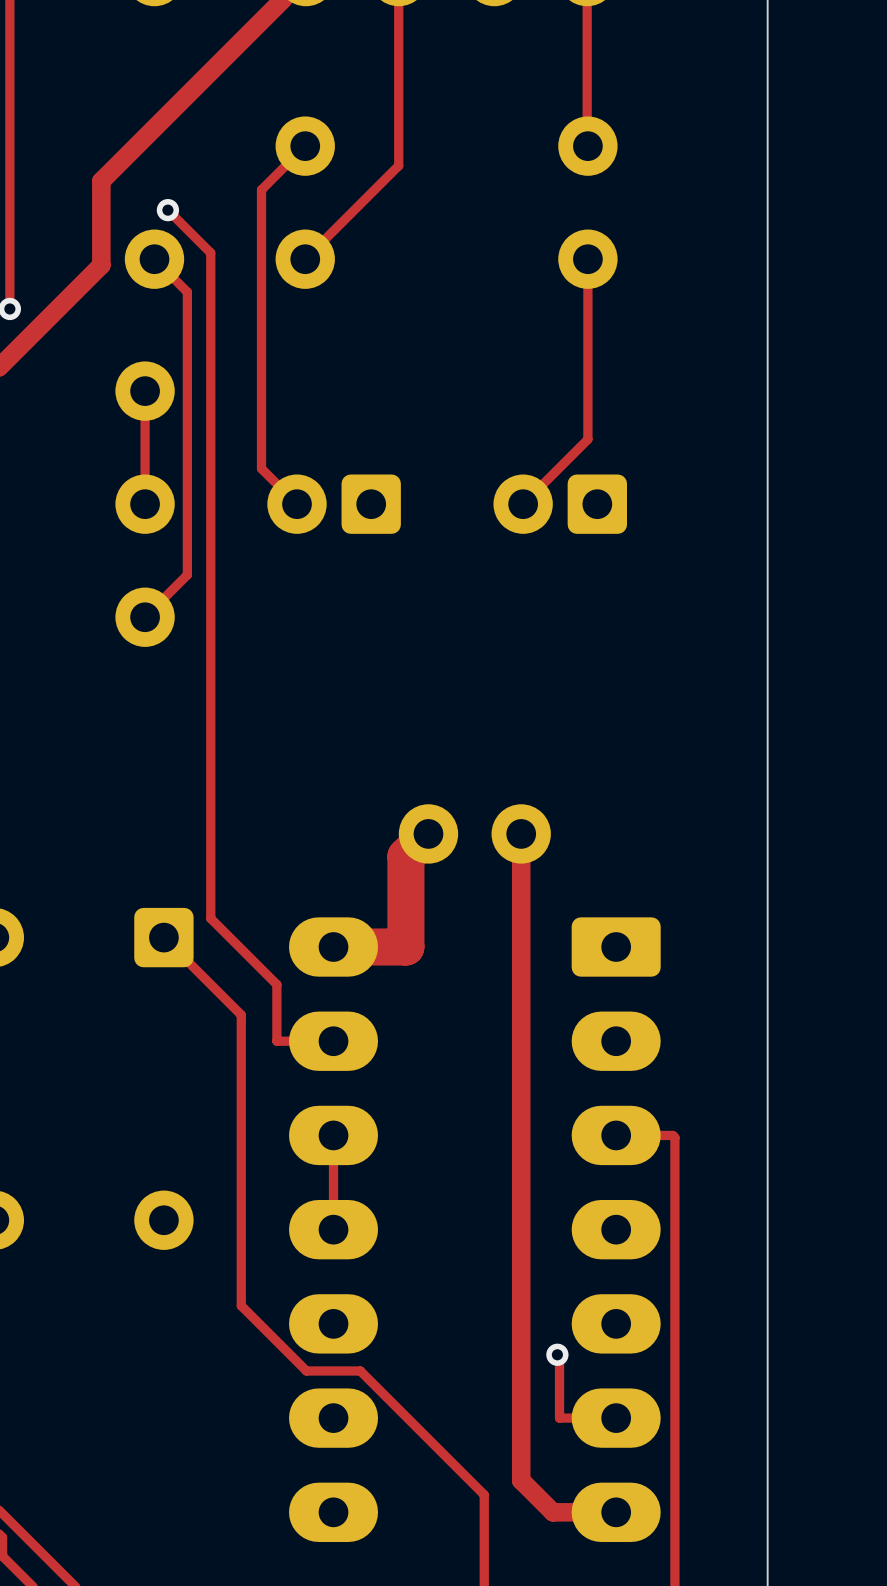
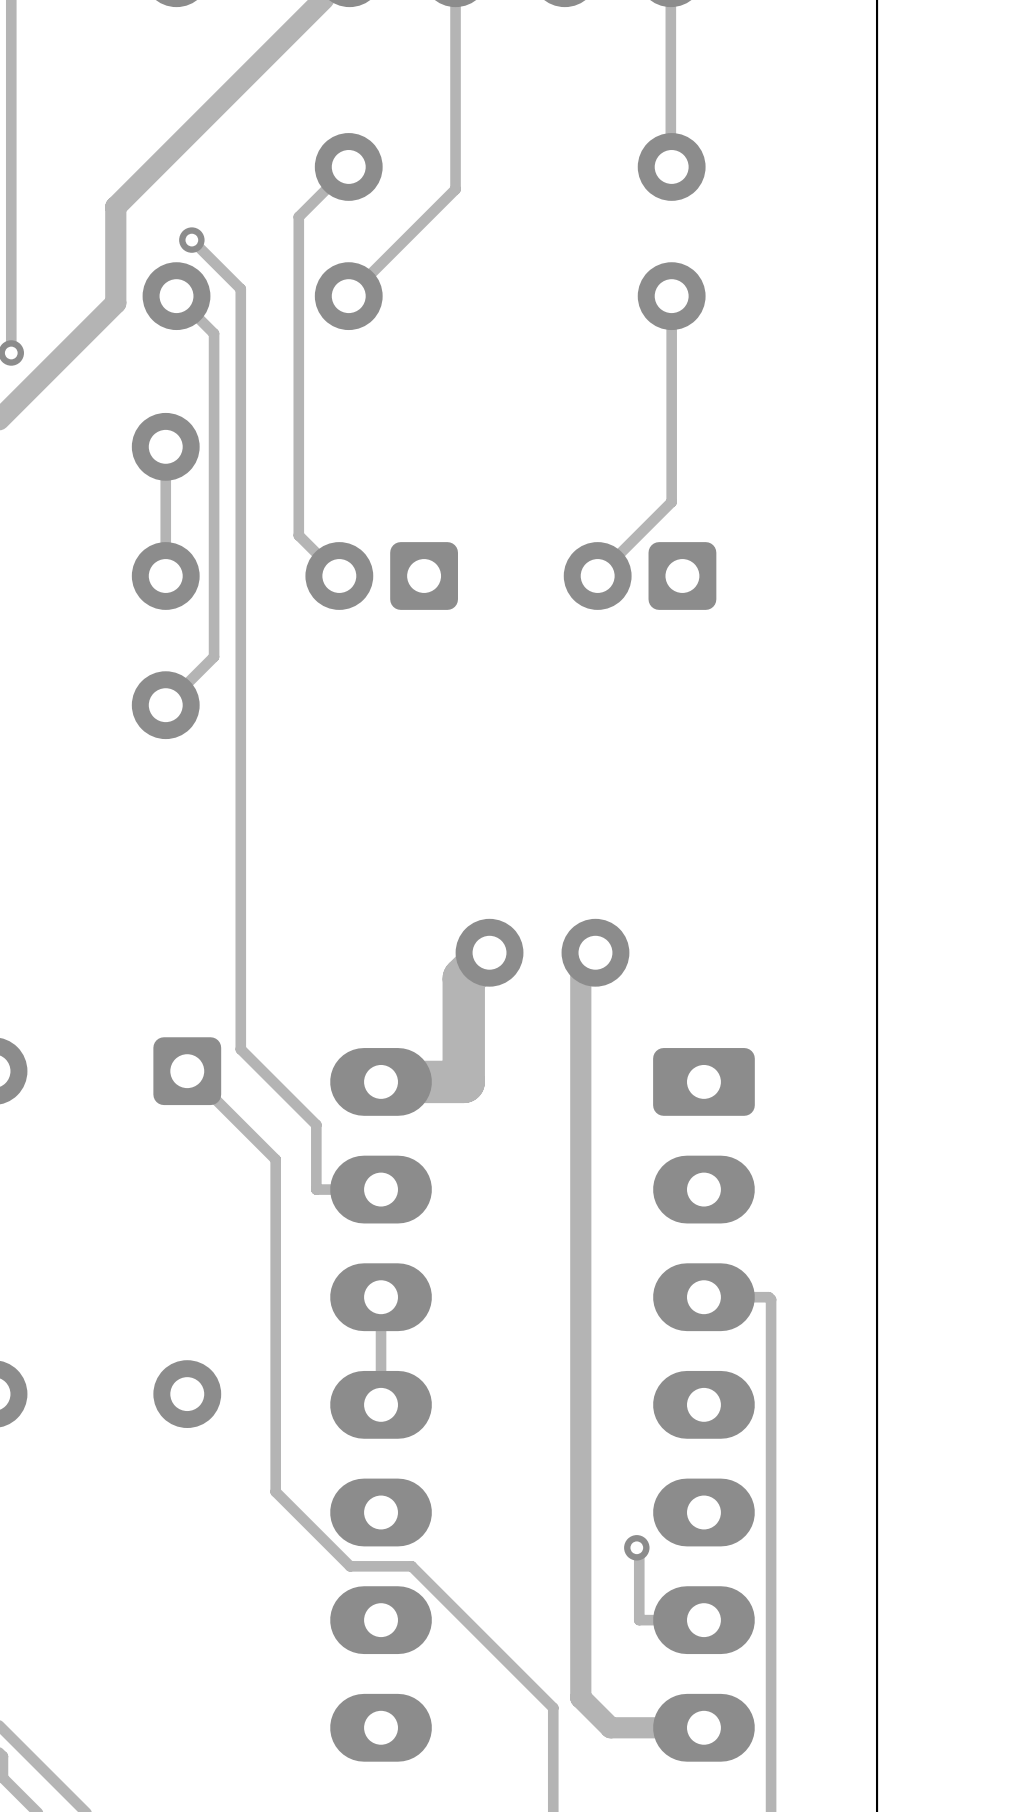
track: (521, 833) (521, 1480) (553, 1512) -> (595, 952) (580, 967) (580, 1697) (610, 1727) (631, 1727)

